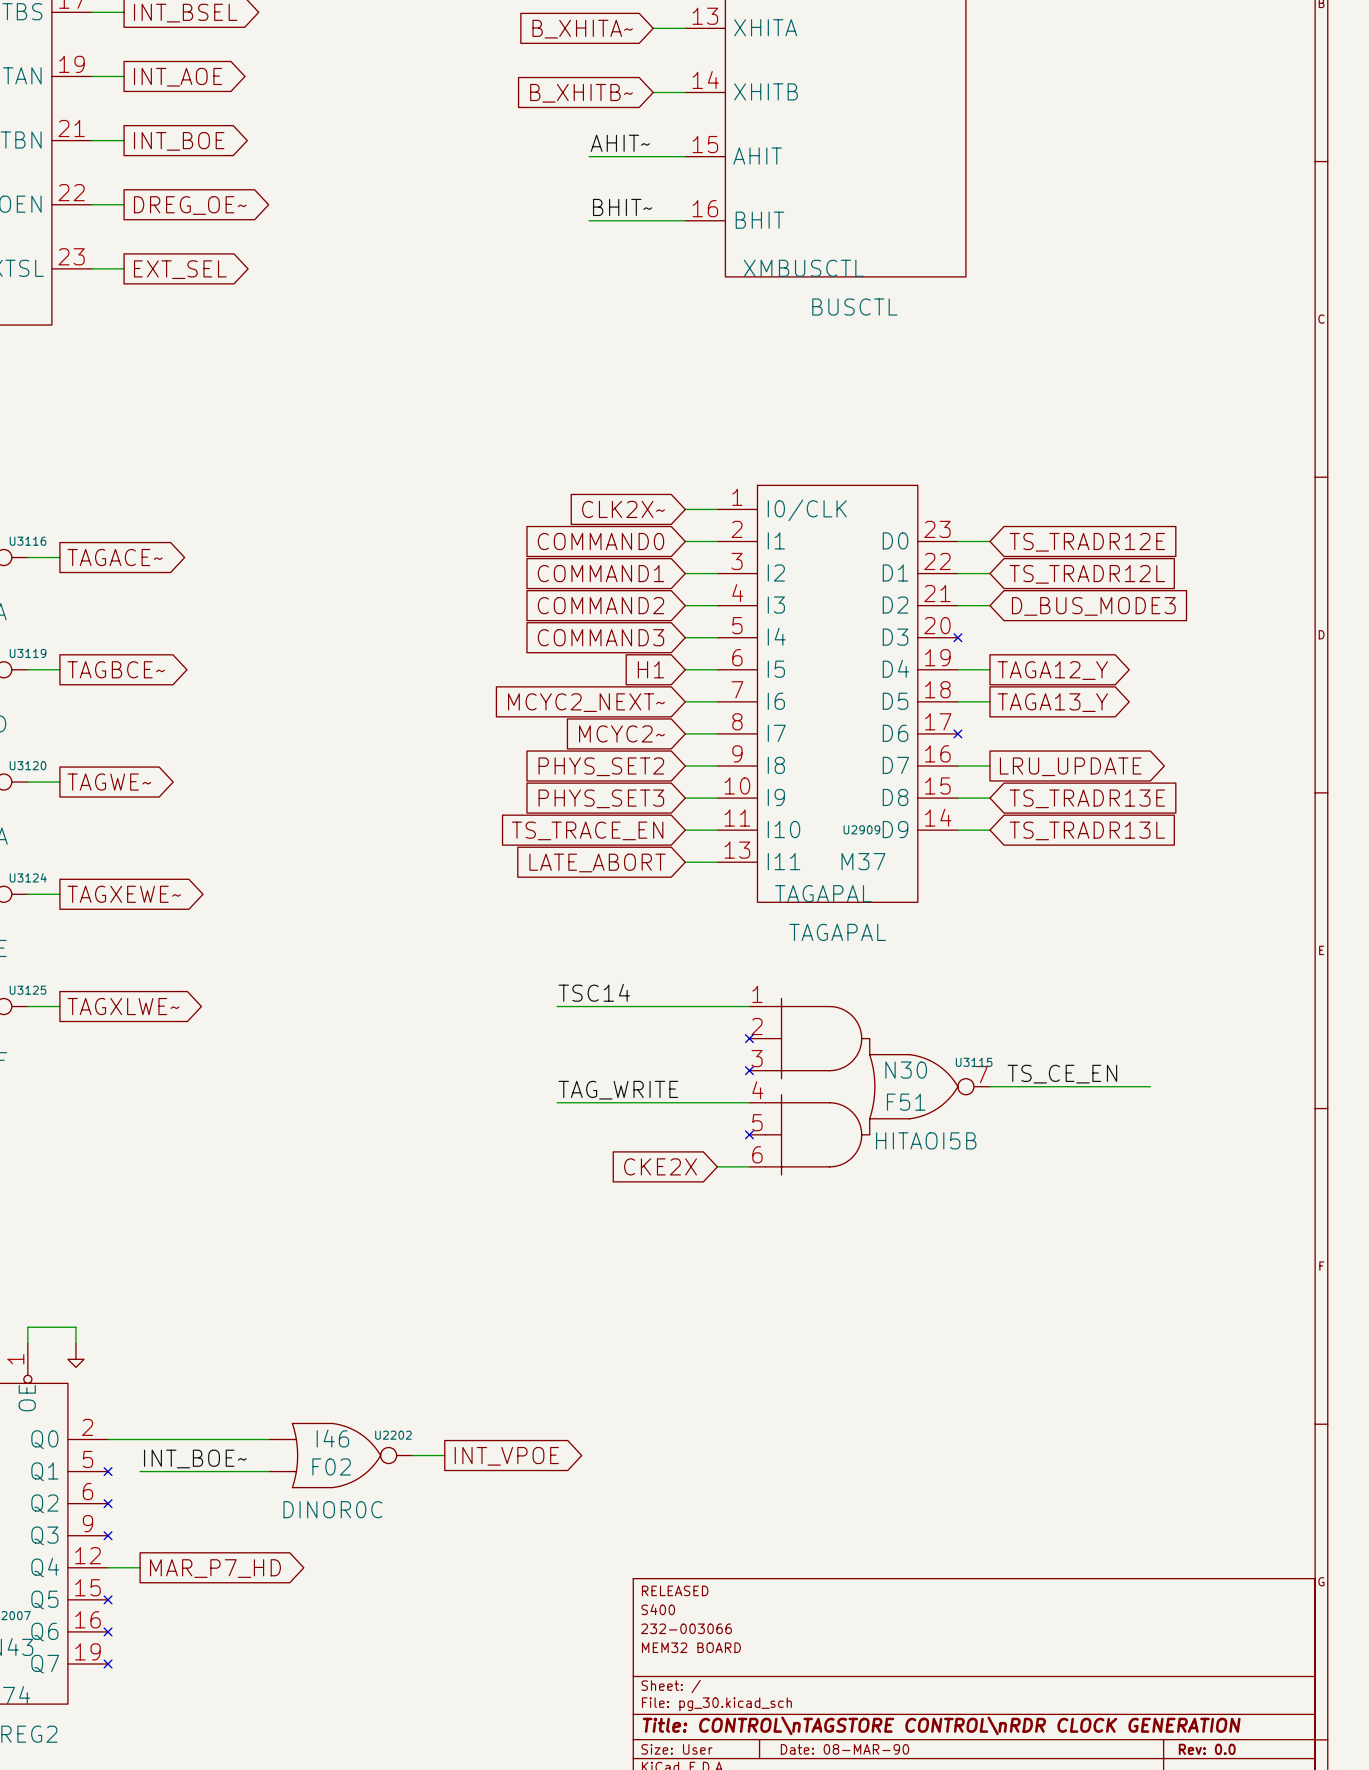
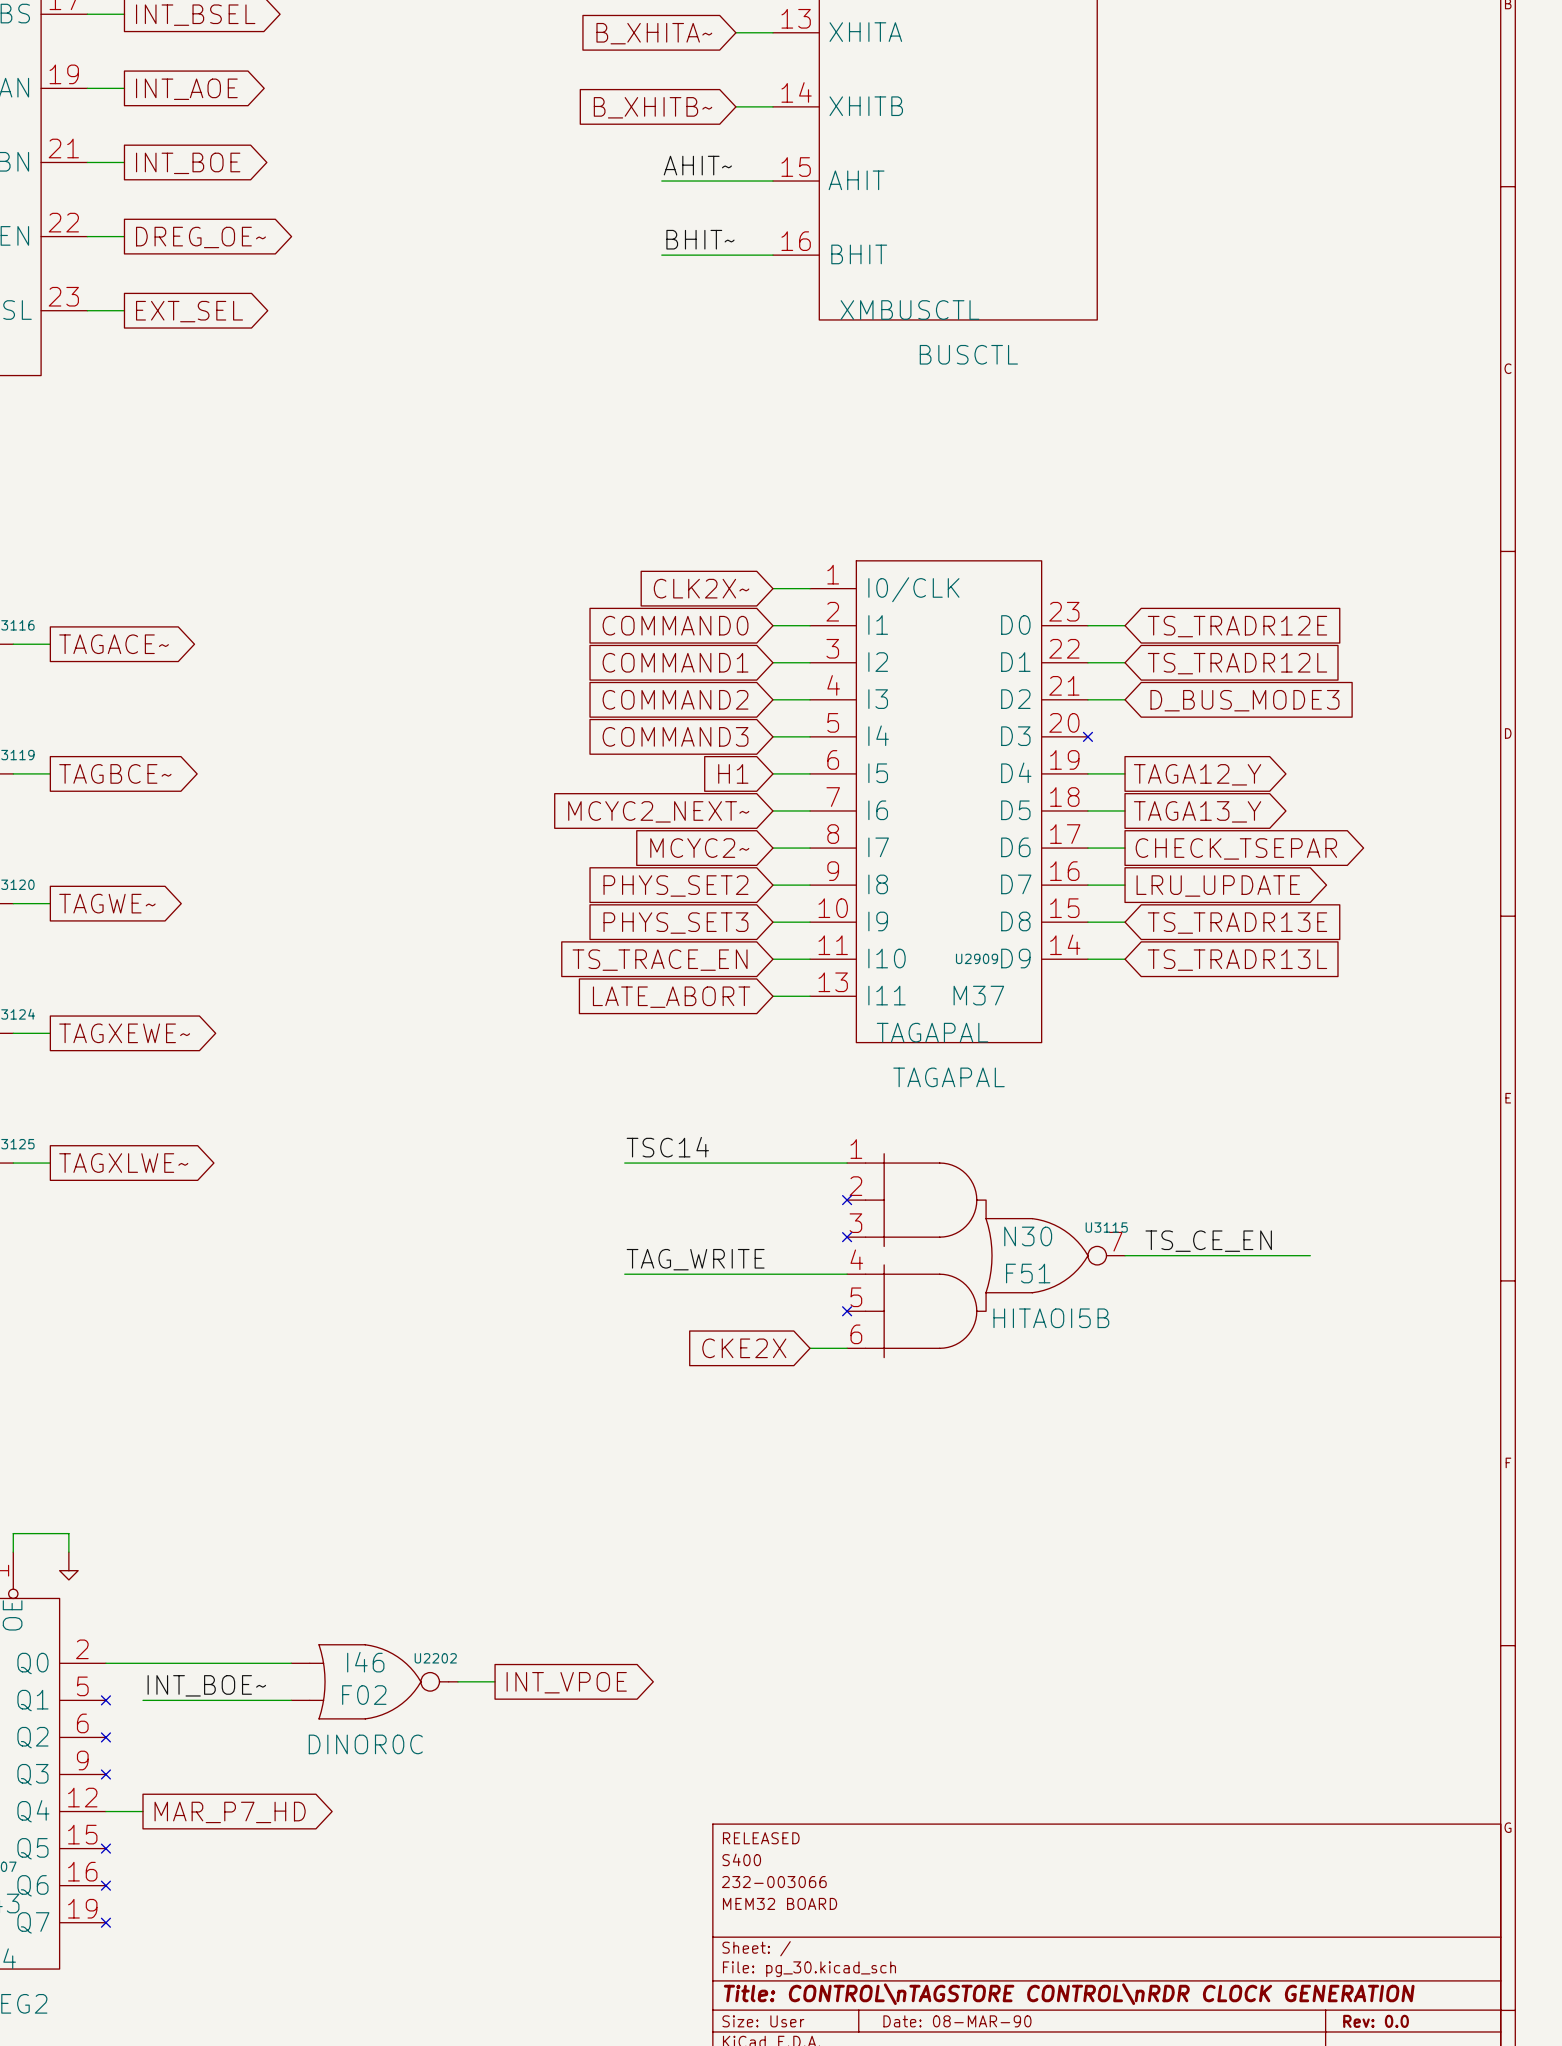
wire: none -> (1087, 848) (1125, 848)
no-connect mark: (957, 733) -> none
global label: none -> CHECK_TSEPAR (1236, 848)

